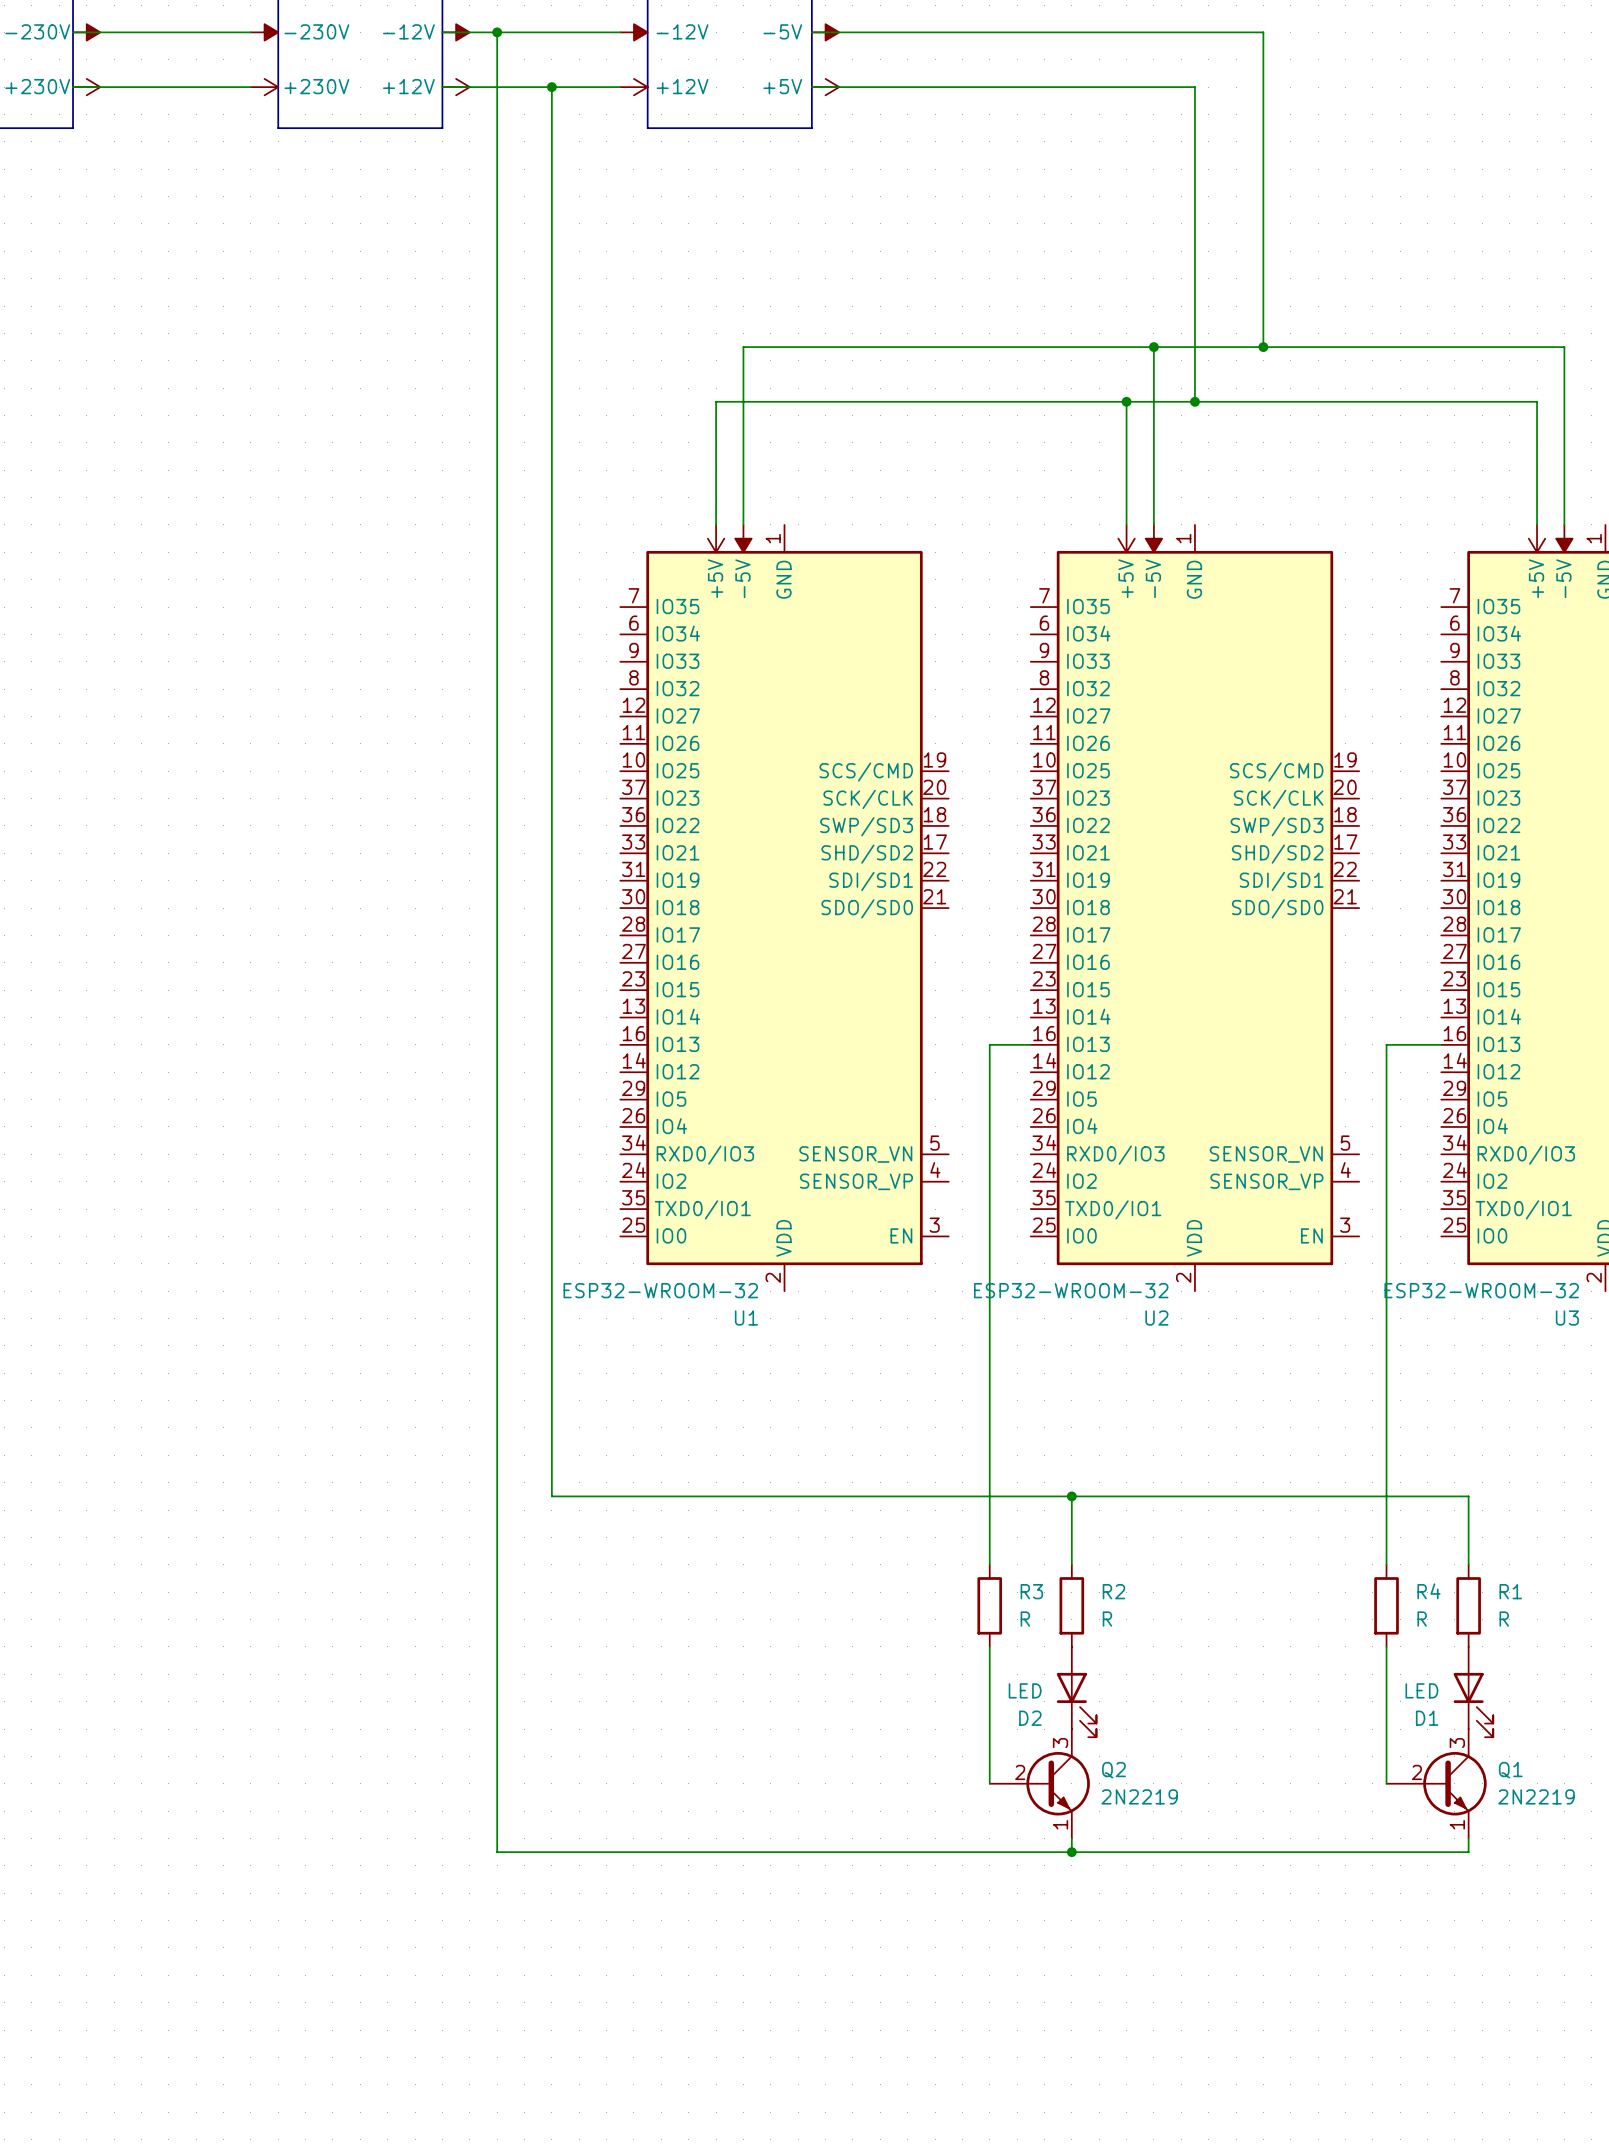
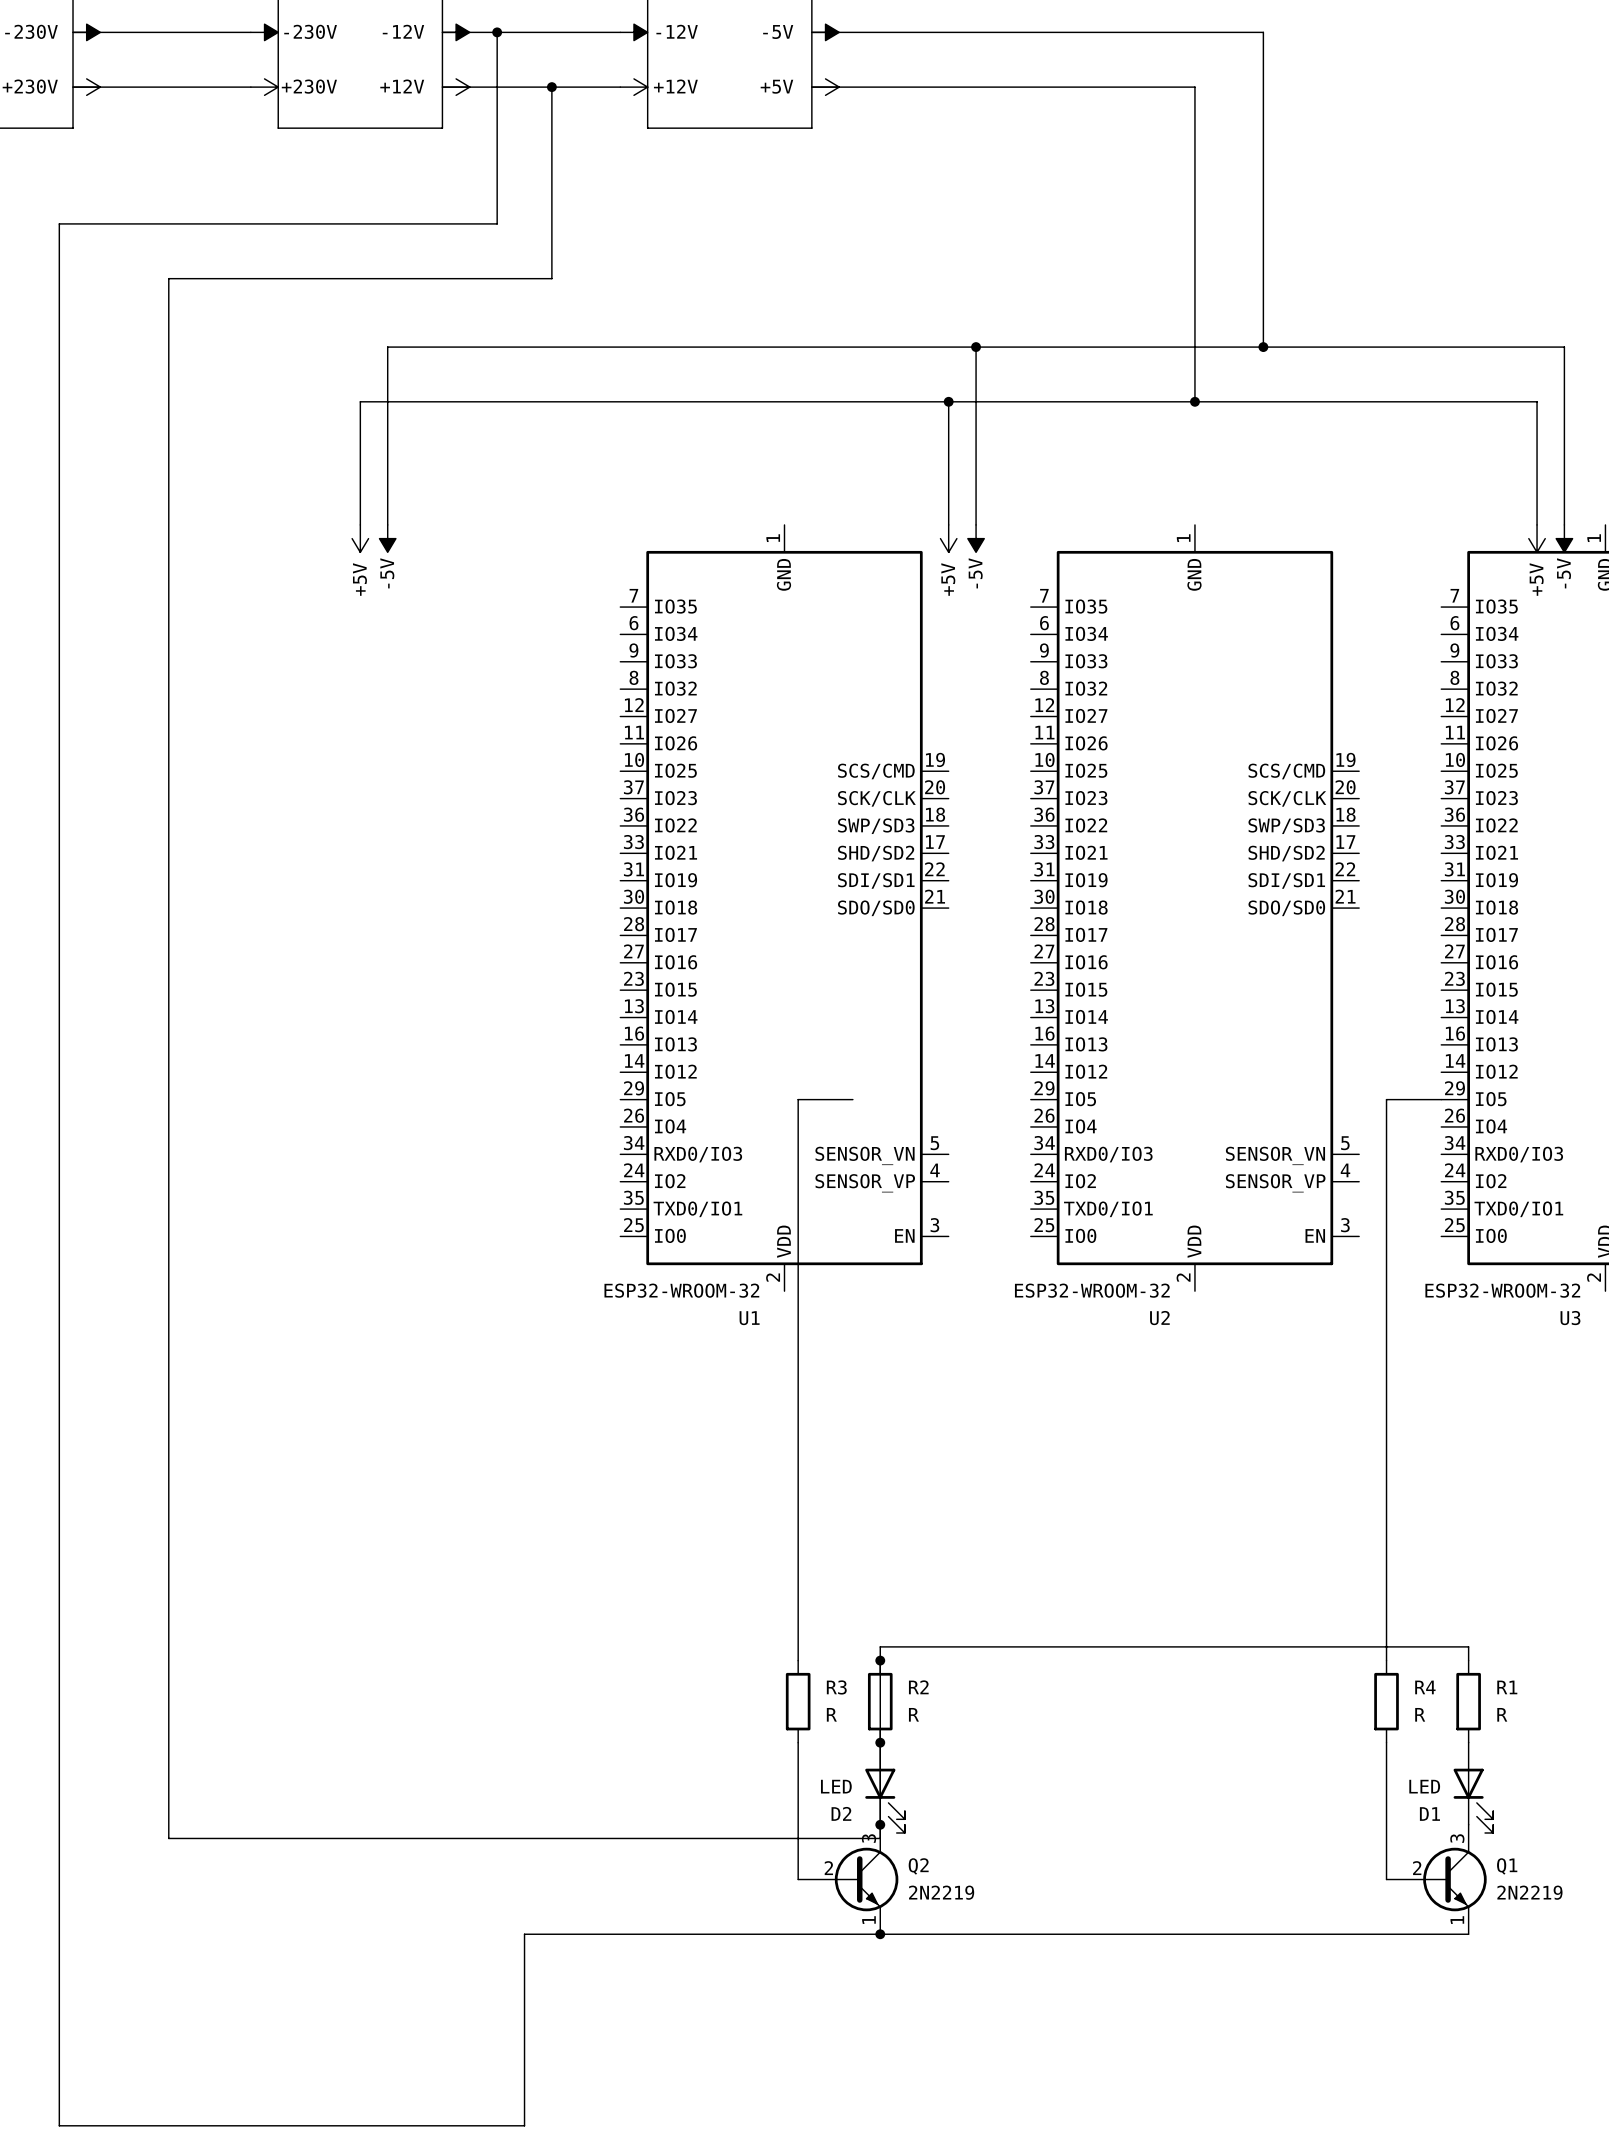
wire: (497, 223) (497, 1852) (1468, 1852) (1468, 1838) -> (497, 223) (59, 223) (59, 2125) (524, 2125) (524, 1934) (1468, 1934)
wire: (551, 278) (551, 1496) (1468, 1496) (1468, 1564) -> (551, 278) (168, 278) (168, 1838) (880, 1838) (880, 1646) (1468, 1646) (1468, 1660)
wire: (743, 347) (743, 524) -> (743, 347) (387, 347) (387, 524)
junction: none -> (976, 347)
wire: (1153, 347) (1153, 524) -> (976, 347) (976, 524)
junction: (1153, 347) -> none
wire: (716, 401) (716, 524) -> (716, 401) (360, 401) (360, 524)
junction: none -> (948, 401)
wire: (1126, 401) (1126, 524) -> (948, 401) (948, 524)
junction: (1126, 401) -> none
power symbol: none -> +5V (360, 538)
power symbol: none -> -5V (387, 538)
power symbol: +5V (716, 538) -> none
power symbol: -5V (743, 538) -> none
power symbol: none -> +5V (948, 538)
power symbol: none -> -5V (976, 538)
power symbol: +5V (1126, 538) -> none
power symbol: -5V (1153, 538) -> none
wire: (1030, 1044) (989, 1044) (989, 1564) -> none
wire: (1441, 1044) (1386, 1044) (1386, 1099) -> (1441, 1099) (1386, 1099)
wire: none -> (852, 1099) (798, 1099) (798, 1660)
wire: (1071, 1496) (1071, 1564) -> none
junction: (1071, 1496) -> none
R3 position: (989, 1605) -> (798, 1701)
R2 position: (1071, 1605) -> (880, 1701)
R4 position: (1386, 1605) -> (1386, 1701)
R1 position: (1468, 1605) -> (1468, 1701)
wire: (989, 1646) (989, 1783) -> (798, 1742) (798, 1879)
junction: none -> (880, 1660)
wire: (1386, 1660) (1386, 1742) -> (1386, 1564) (1386, 1646)
D2 position: (1076, 1692) -> (885, 1787)
D1 position: (1473, 1692) -> (1473, 1787)
junction: none -> (880, 1742)
Q2 position: (1039, 1783) -> (848, 1879)
wire: none -> (1386, 1783) (1386, 1879)
Q1 position: (1436, 1783) -> (1436, 1879)
junction: none -> (880, 1824)
wire: (1071, 1838) (1071, 1852) -> none
junction: (1071, 1852) -> none
junction: none -> (880, 1934)

